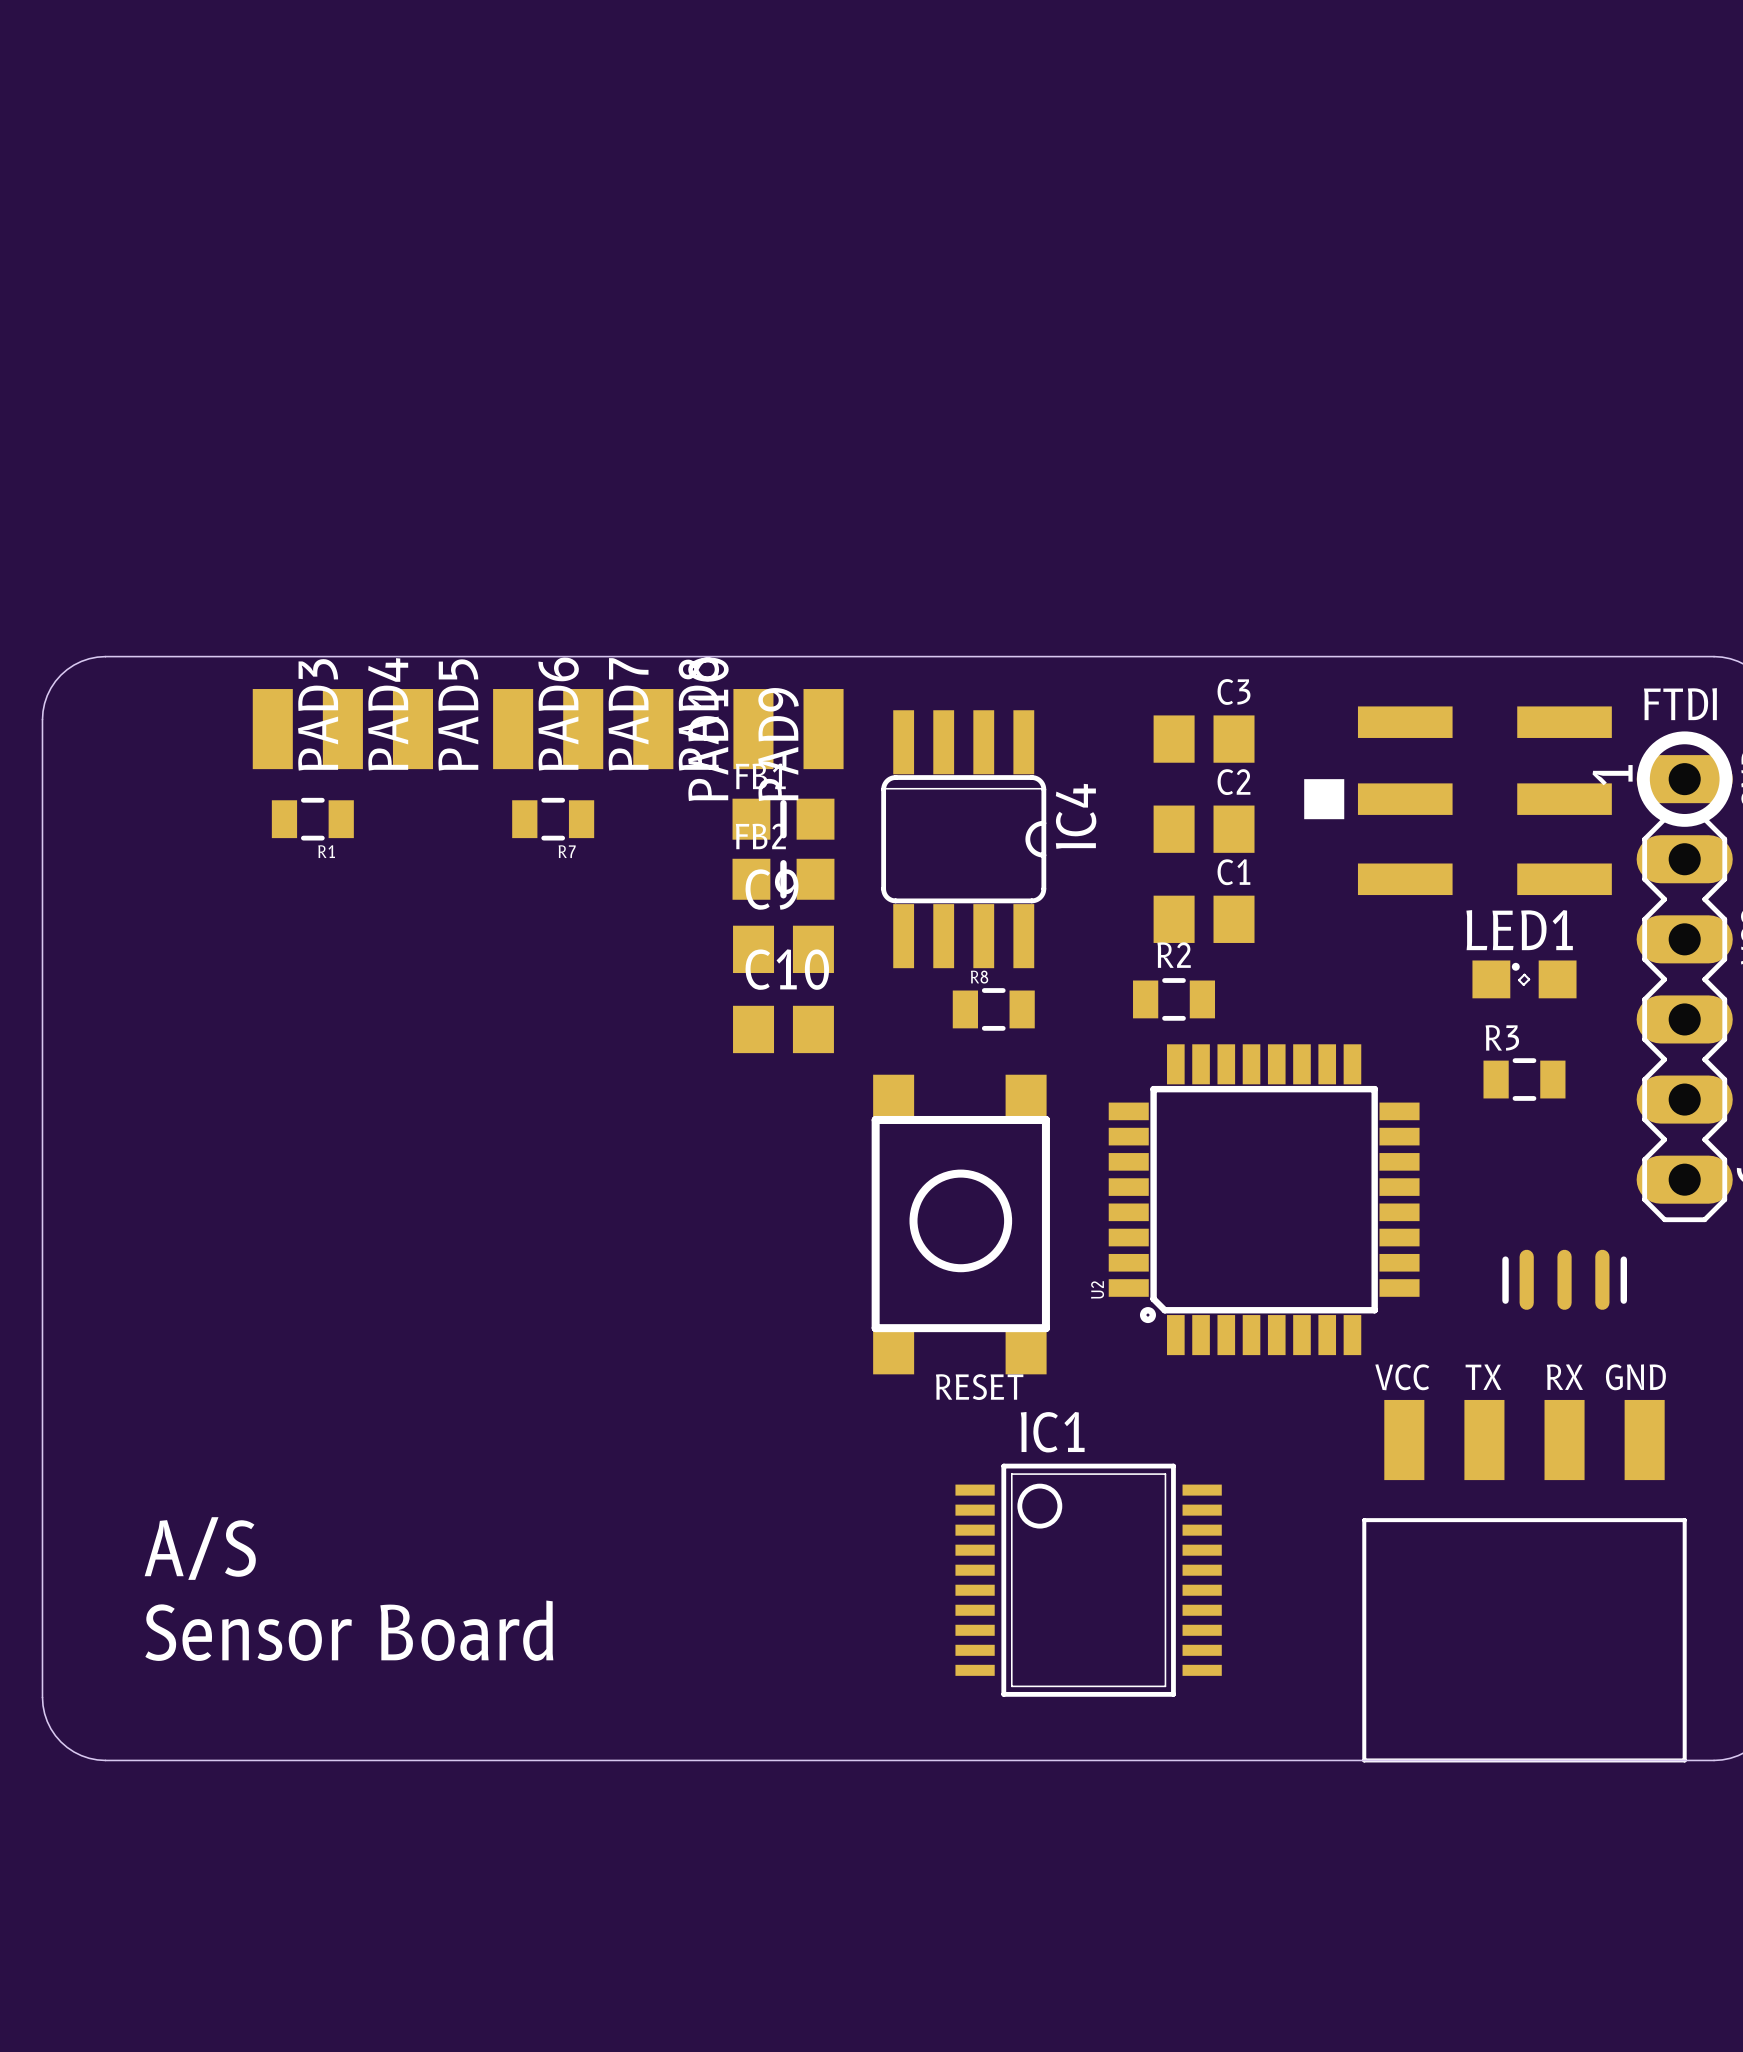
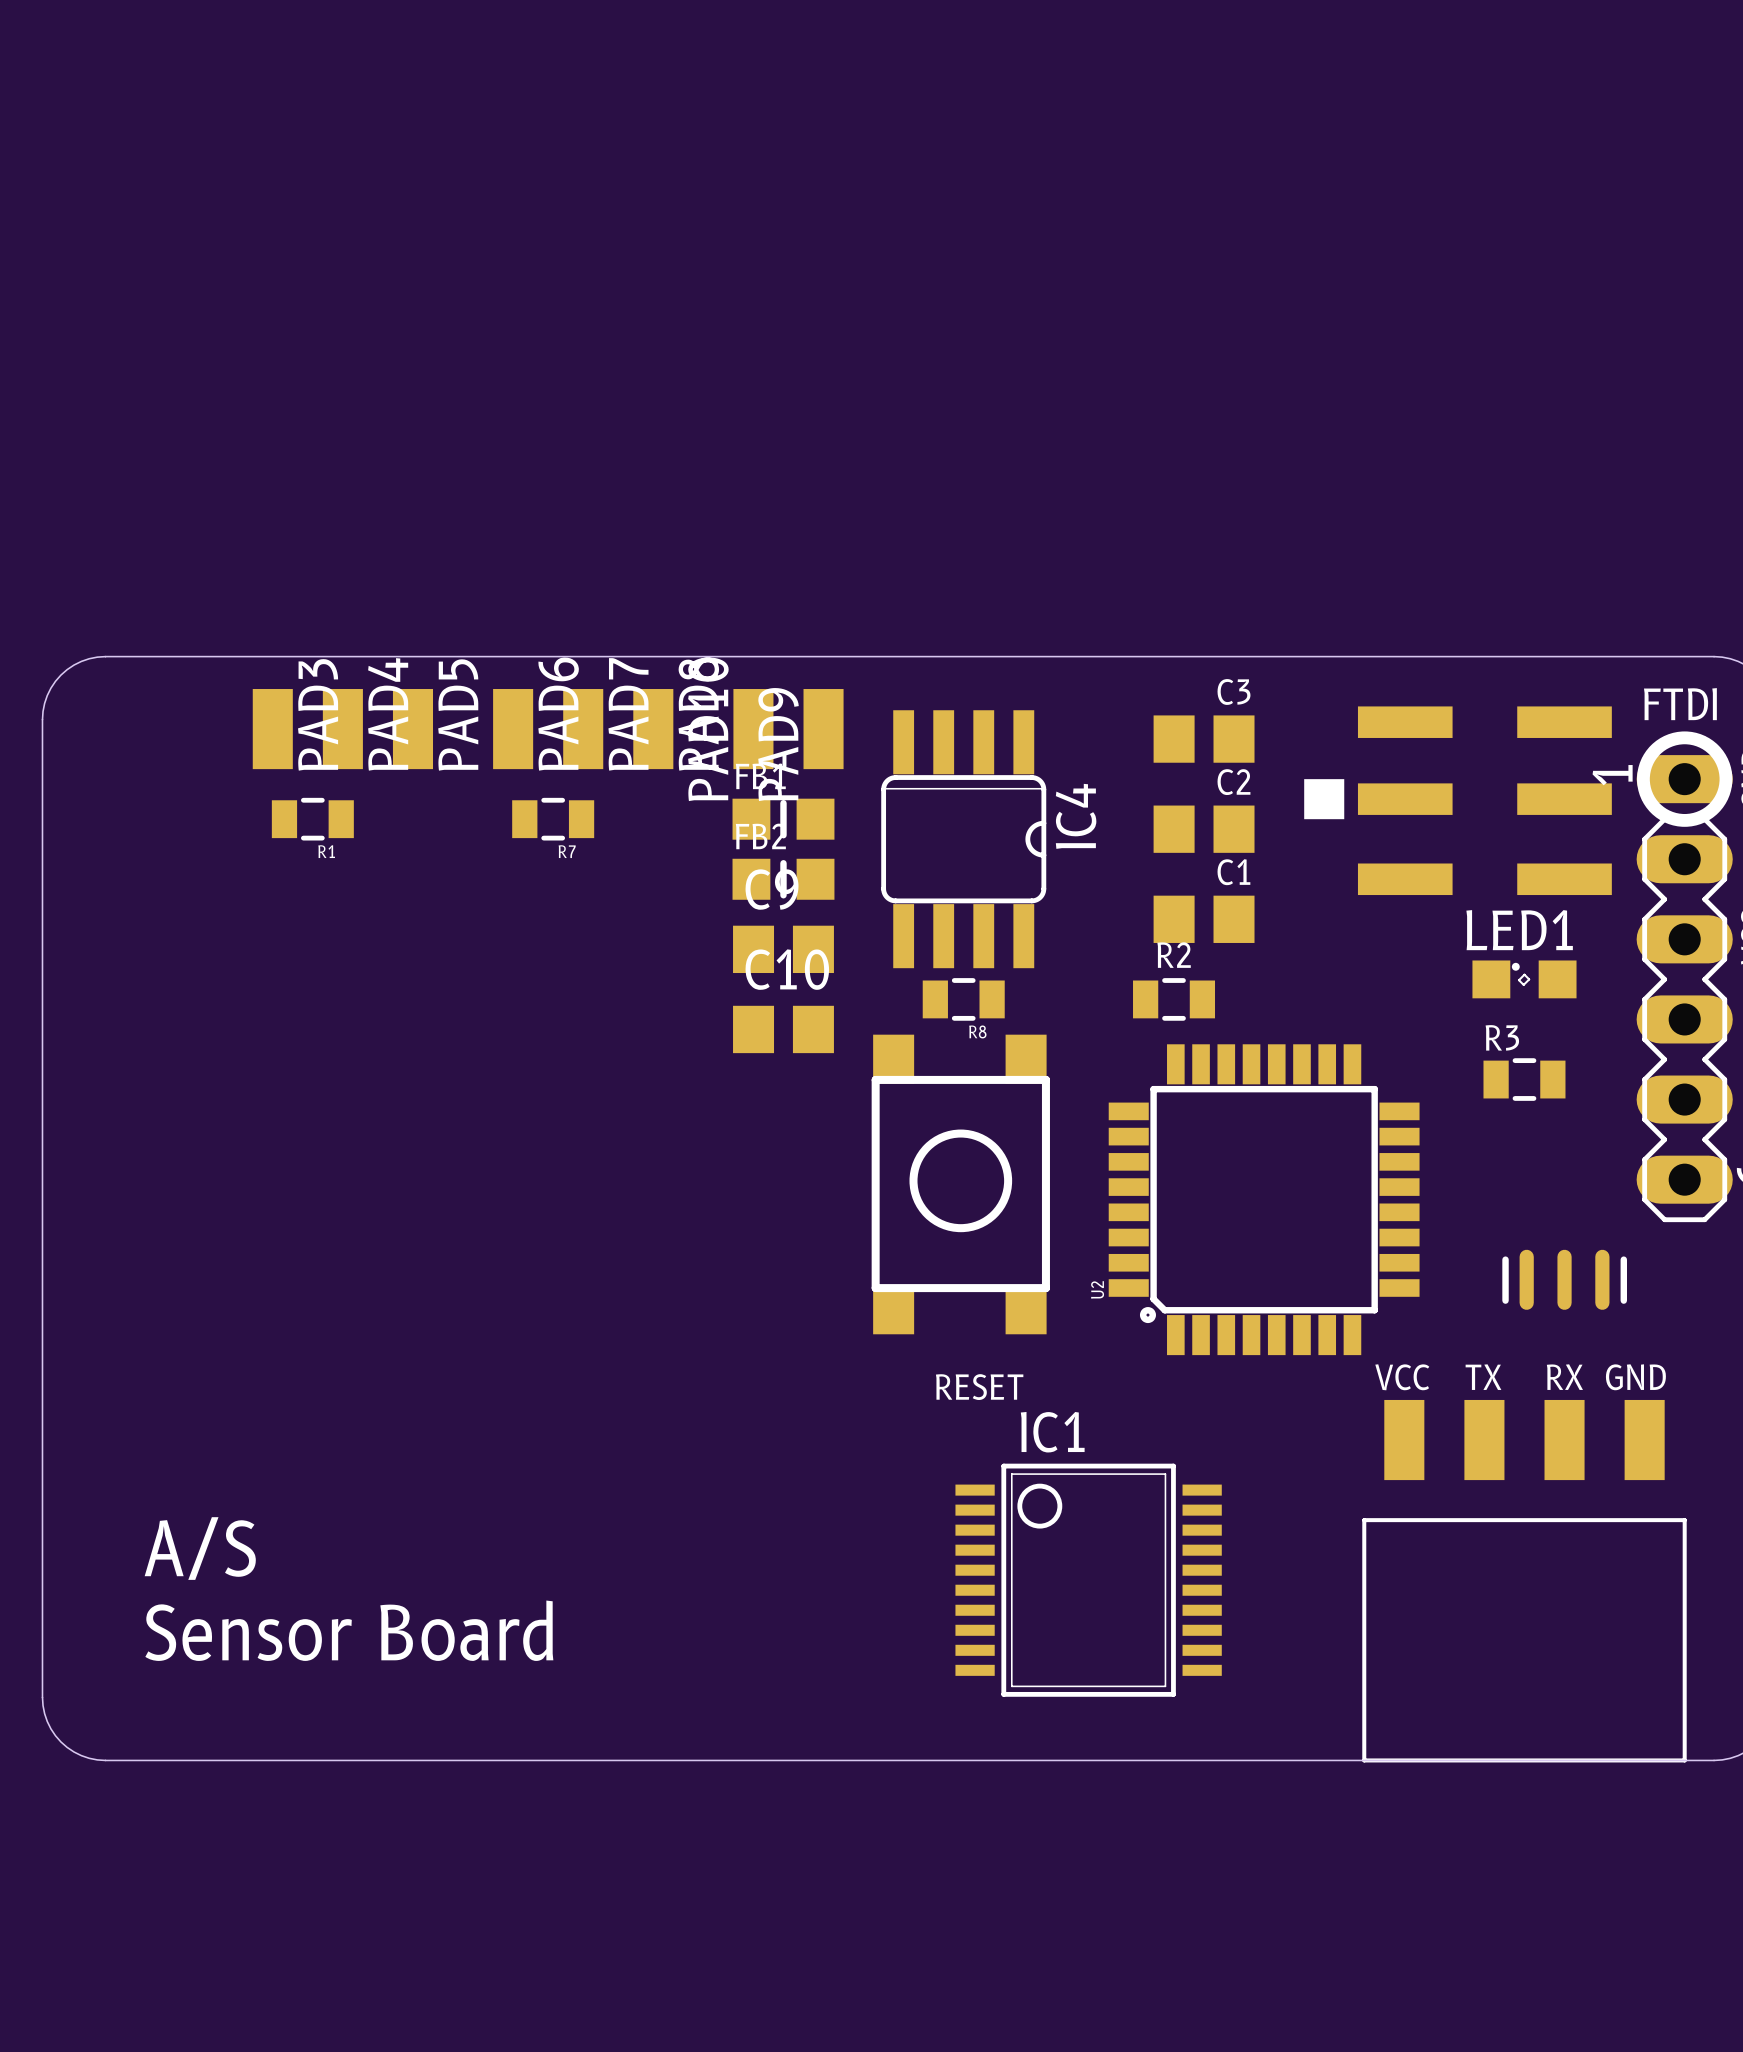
R8 name position: R8 (979, 977) -> R8 (977, 1031)
R8 position: (993, 1009) -> (963, 999)
part position: (960, 1224) -> (960, 1184)

